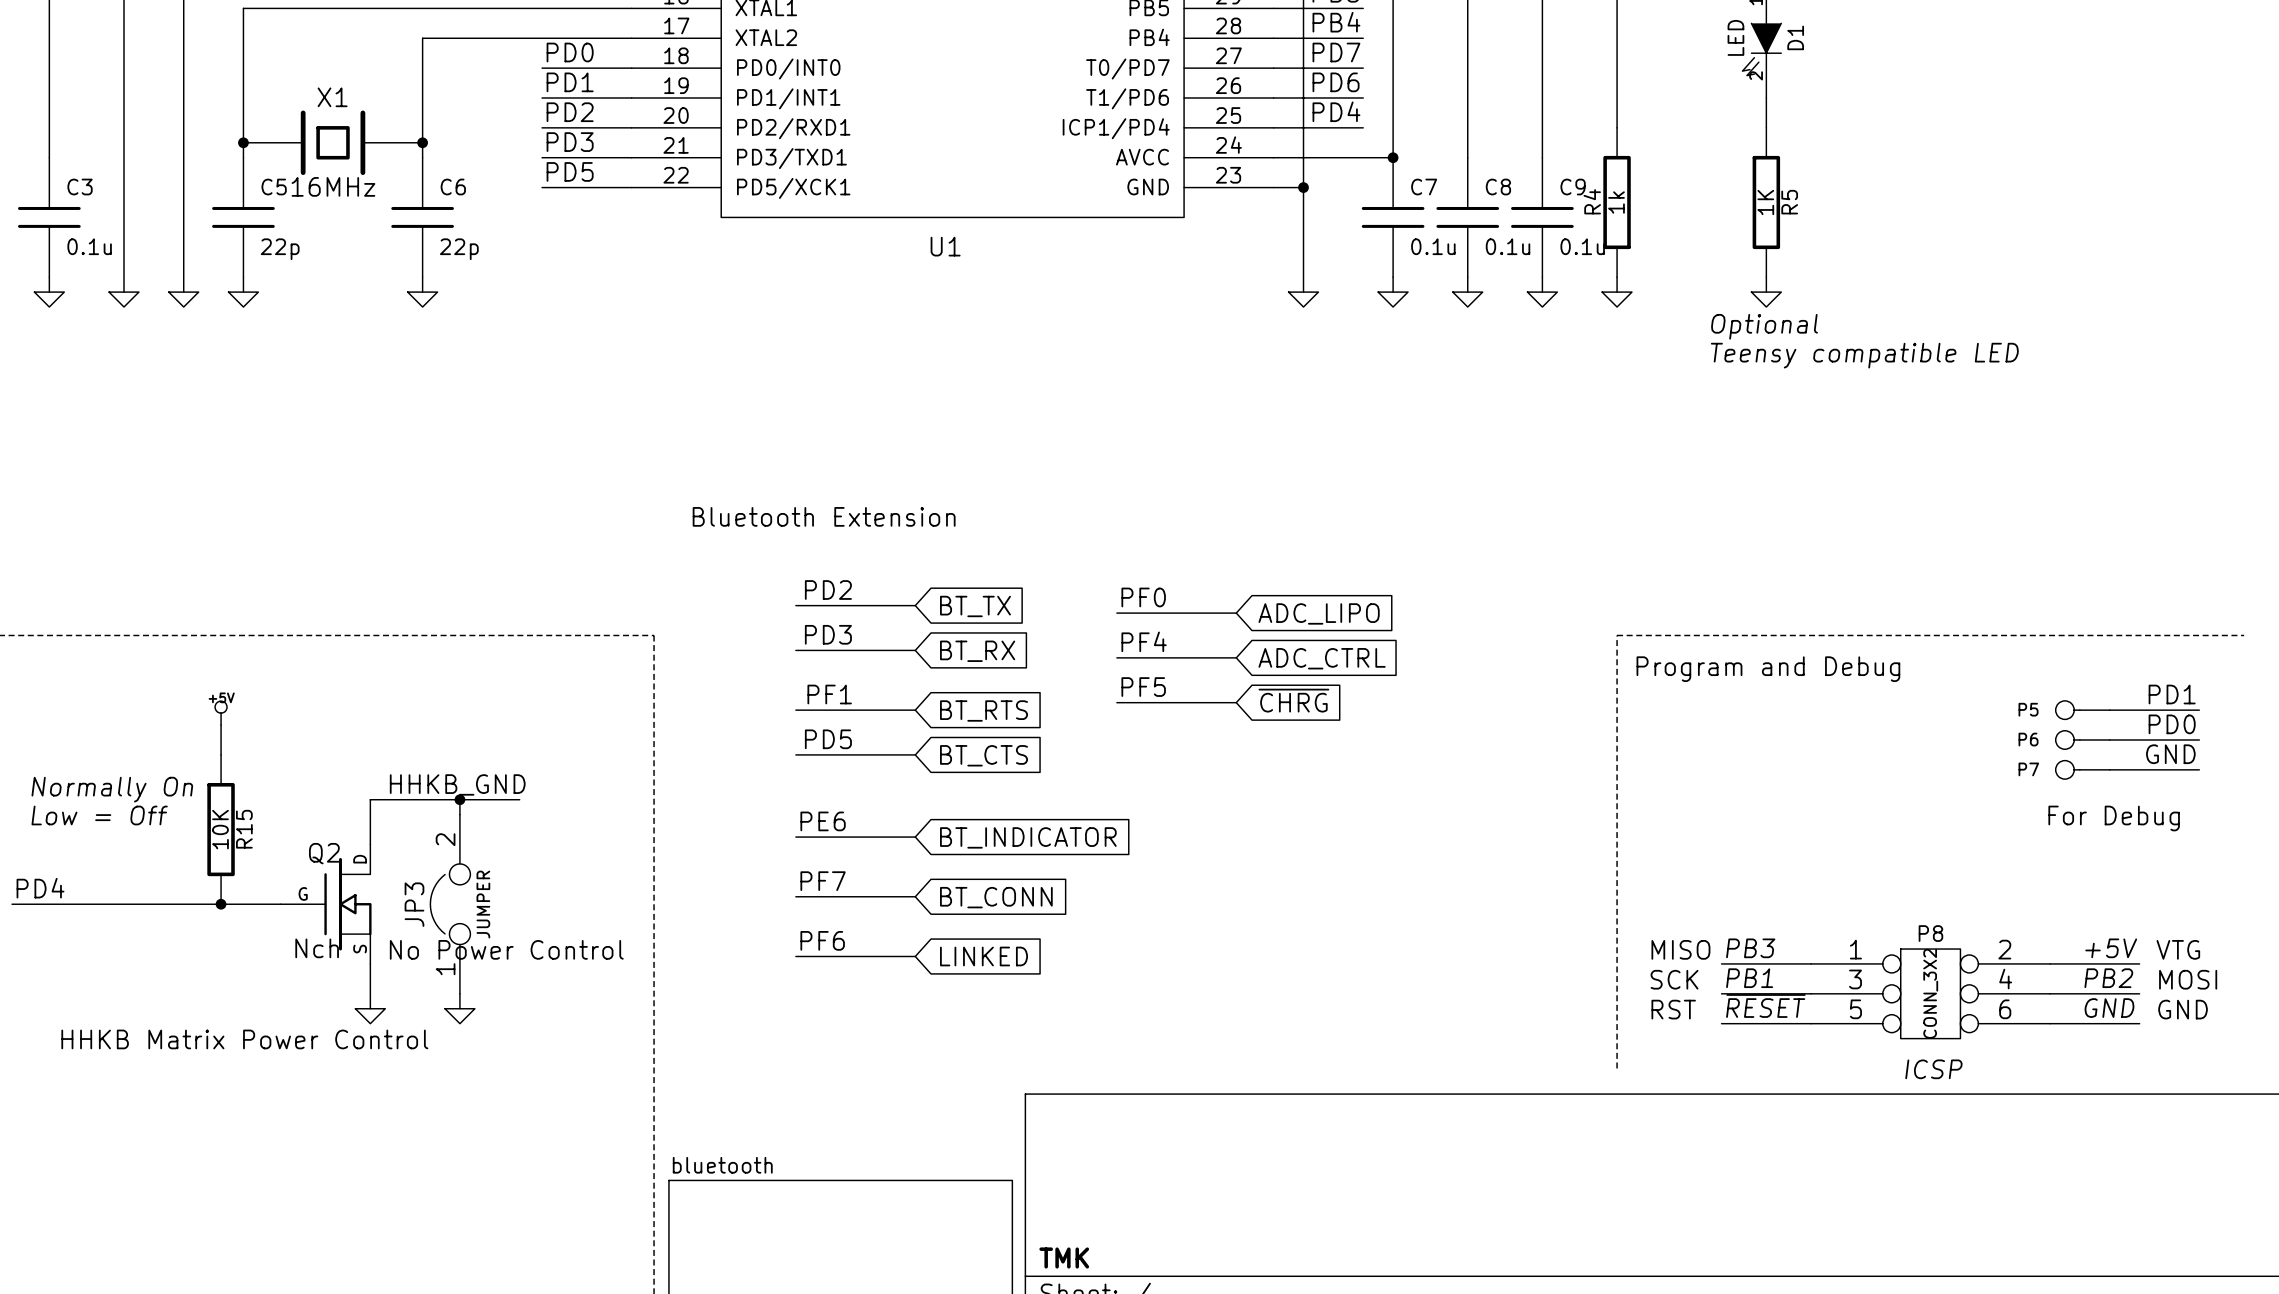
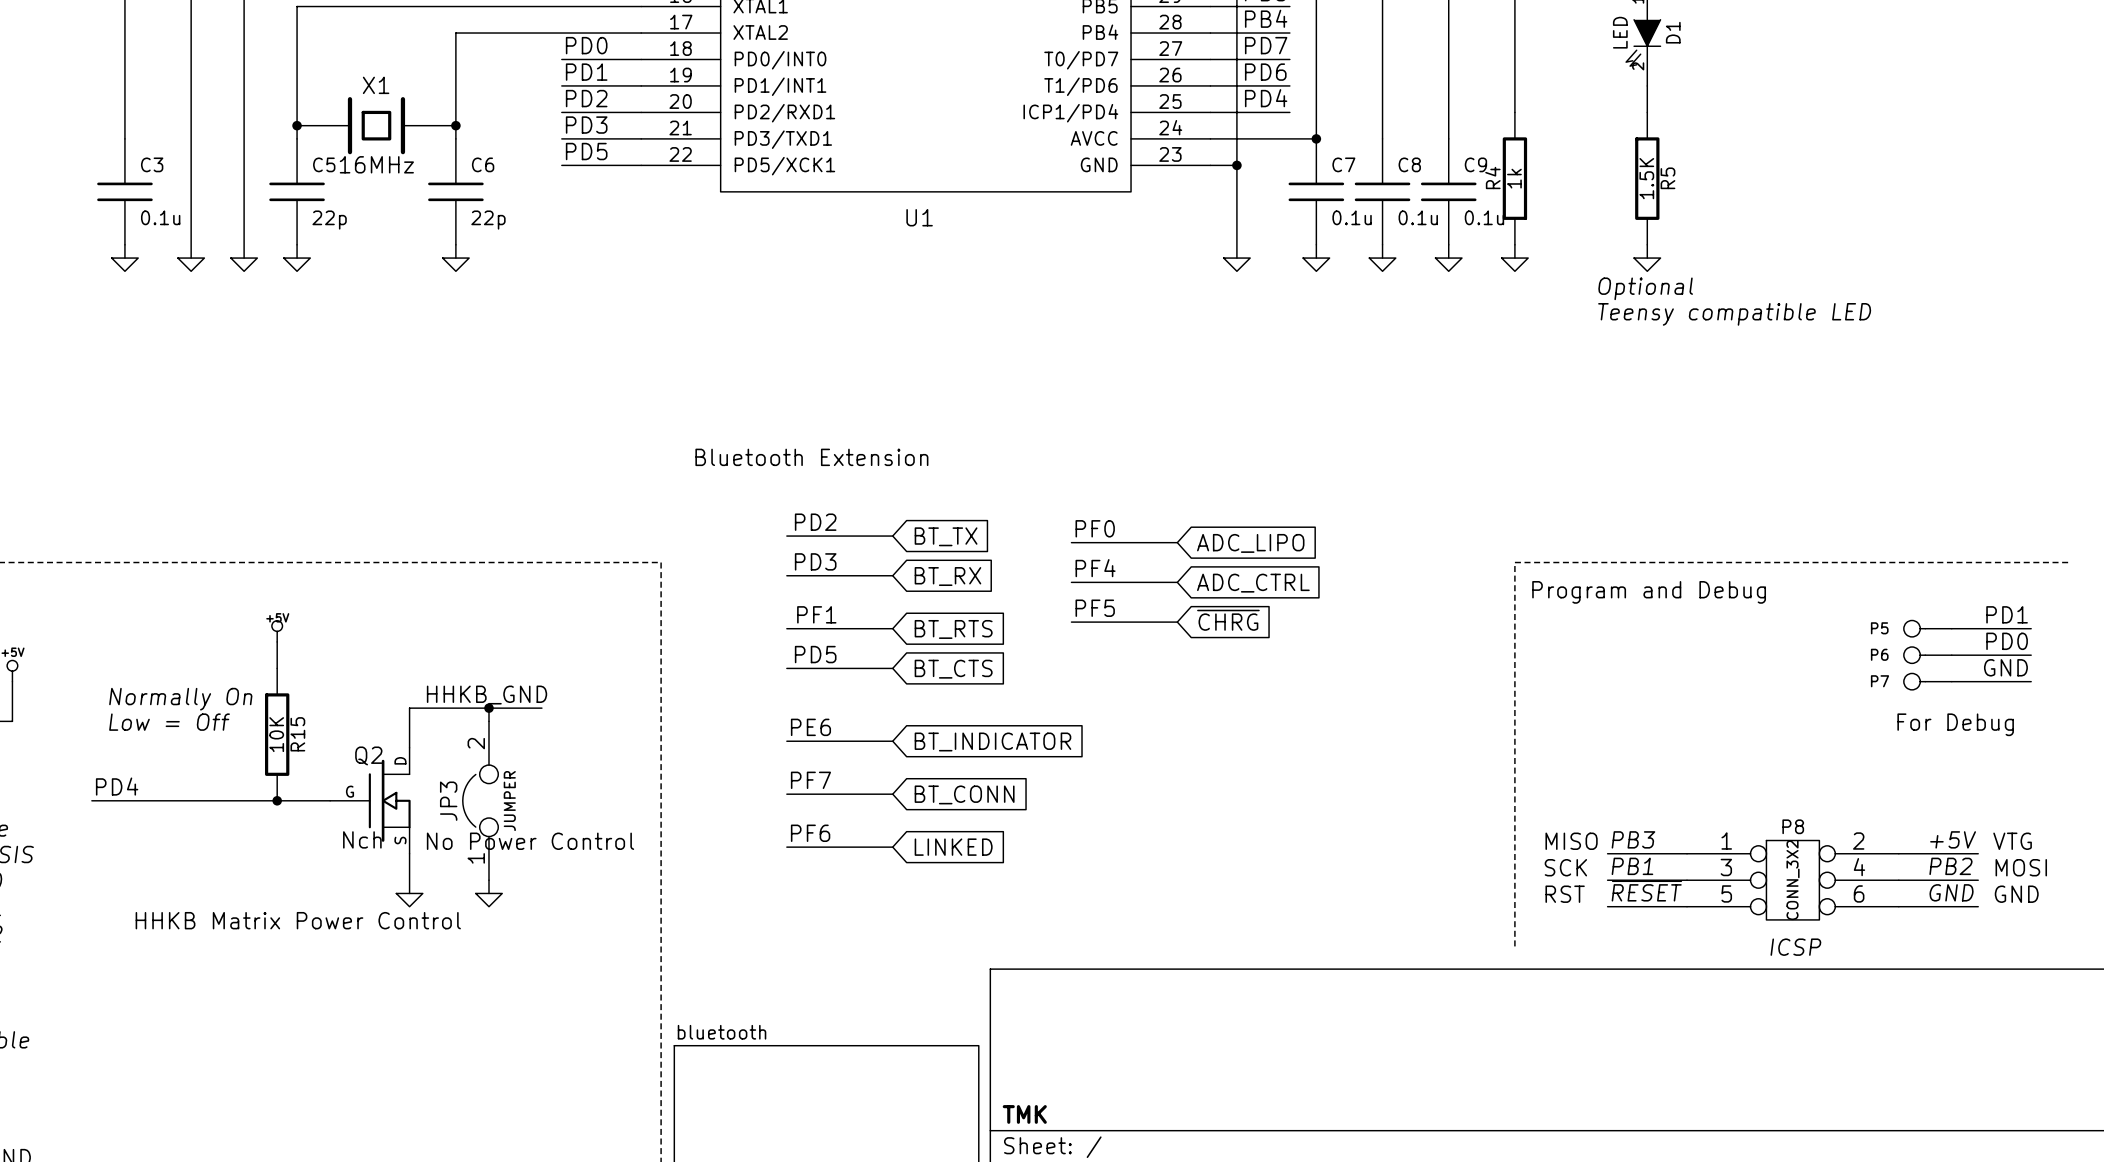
R5 value: 1K (1765, 202) -> 1.5K (1646, 178)

